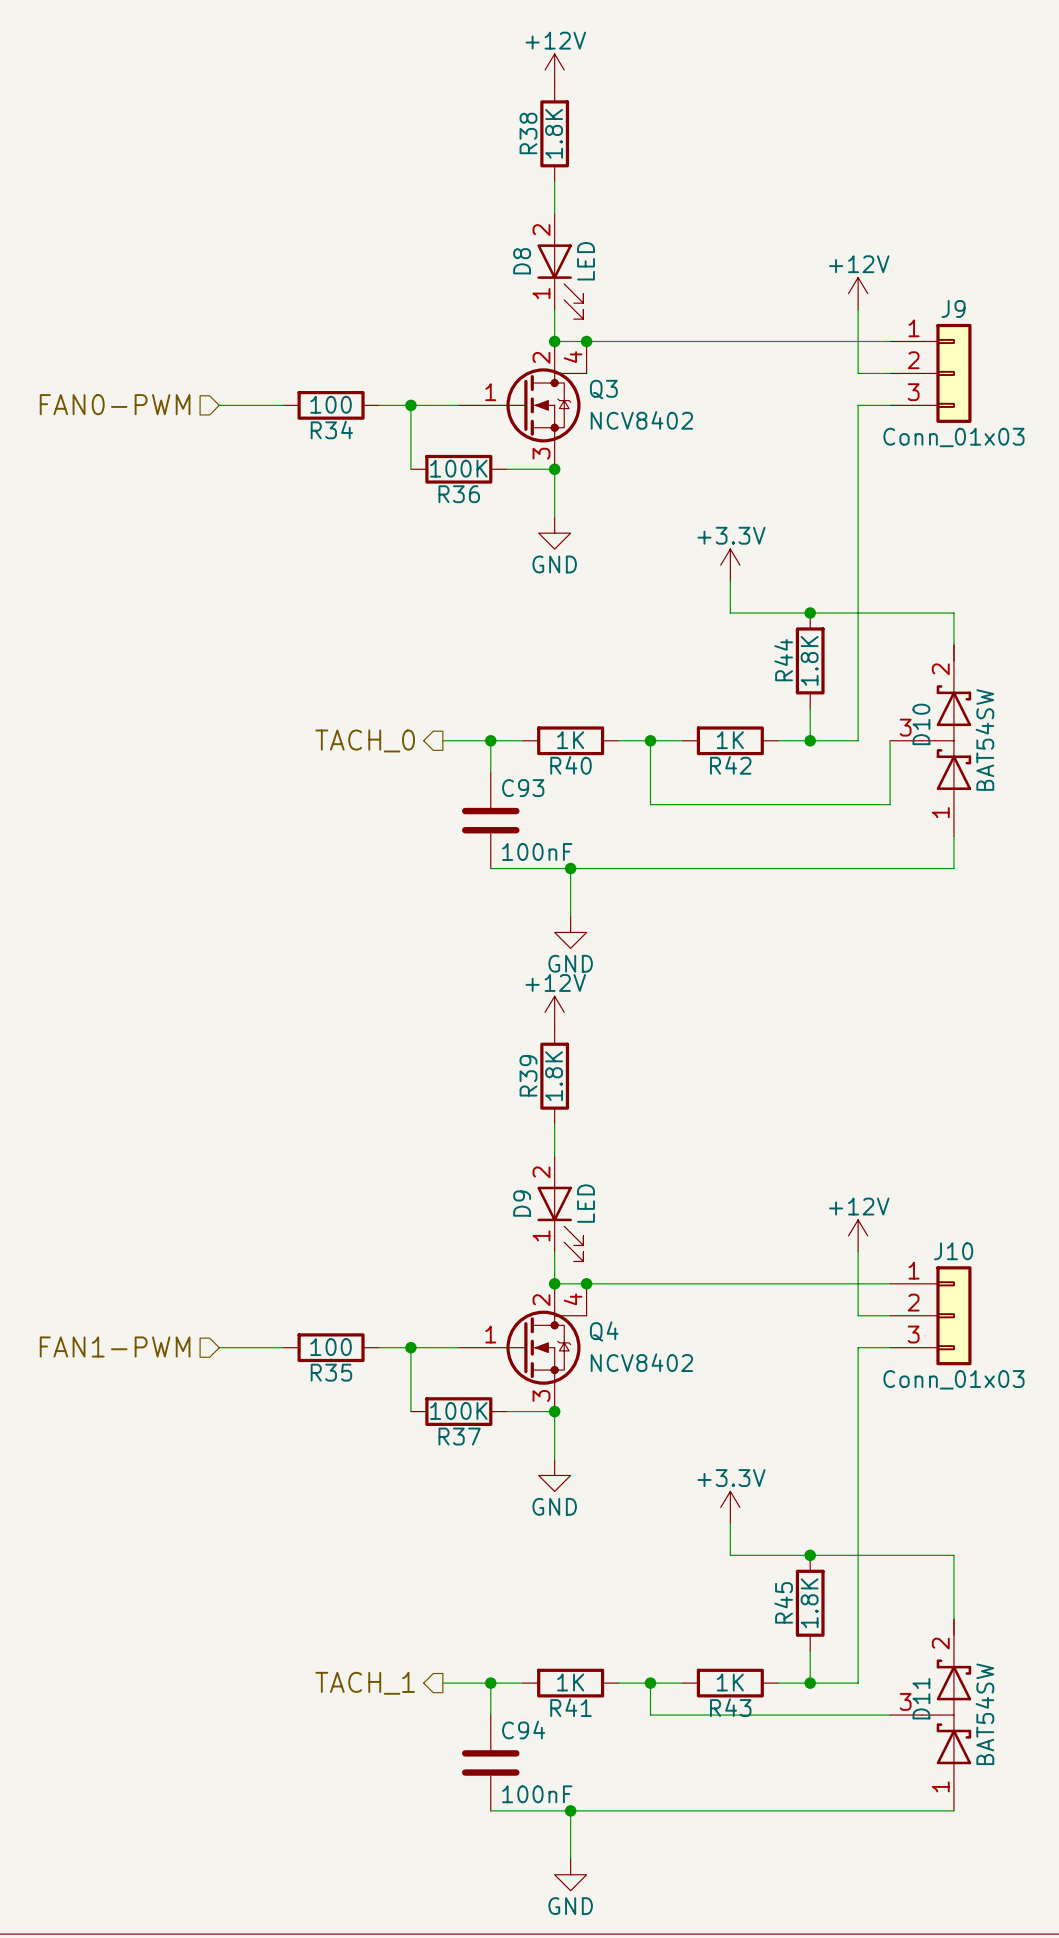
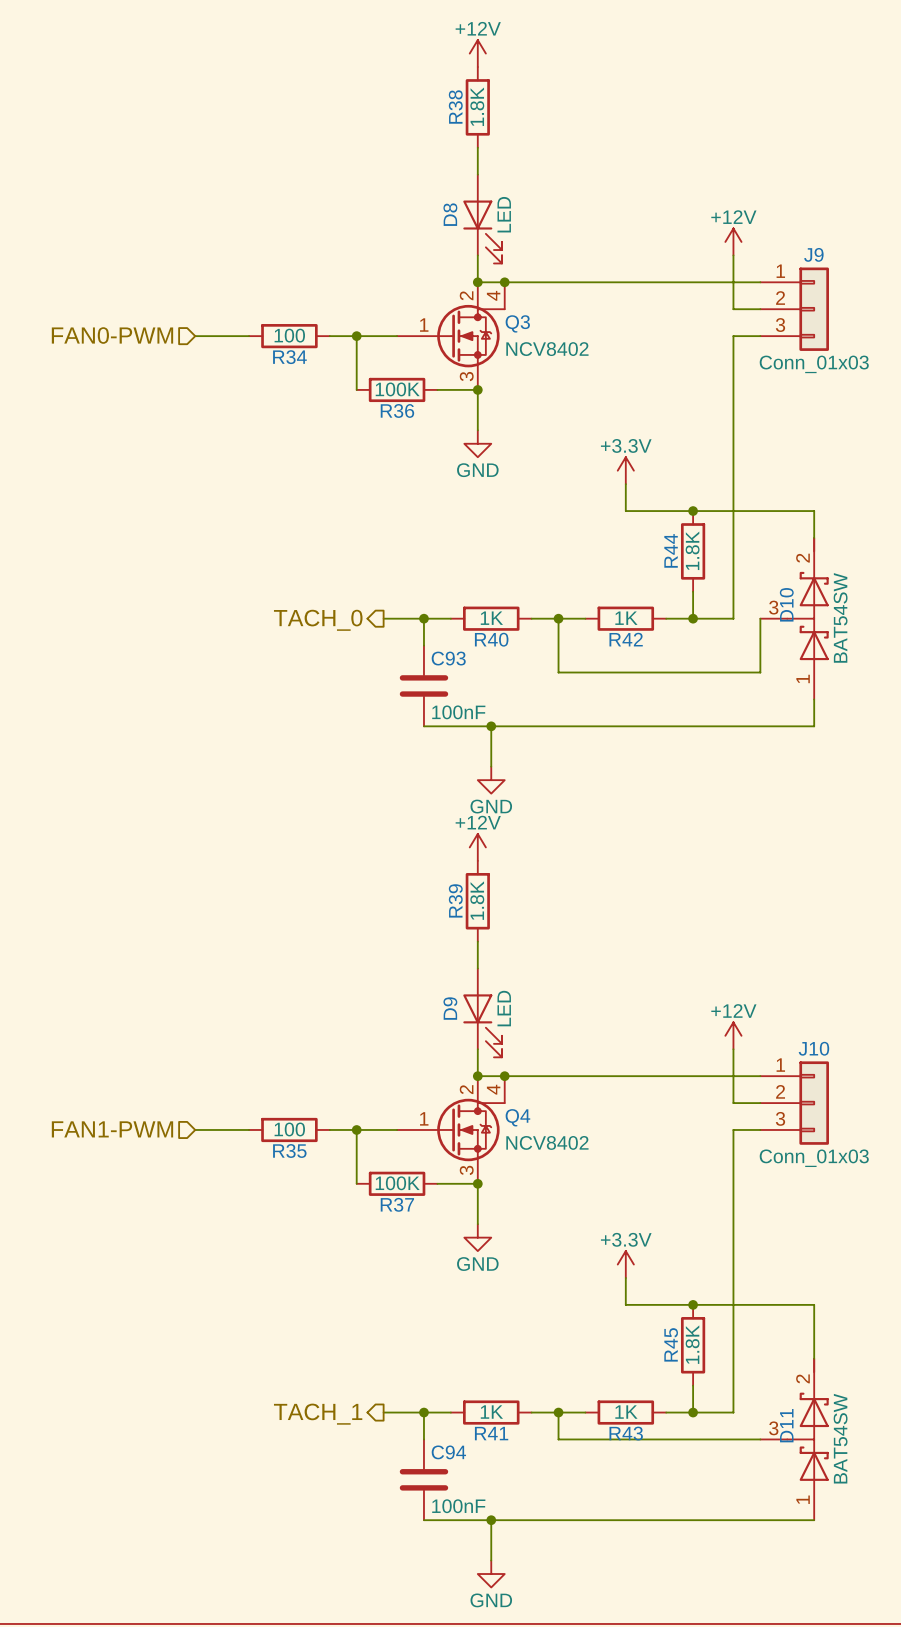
D8 pin number: 2 (541, 230) -> none
D8 pin number: 1 (541, 293) -> none
D9 pin number: 2 (541, 1172) -> none
D9 pin number: 1 (541, 1235) -> none

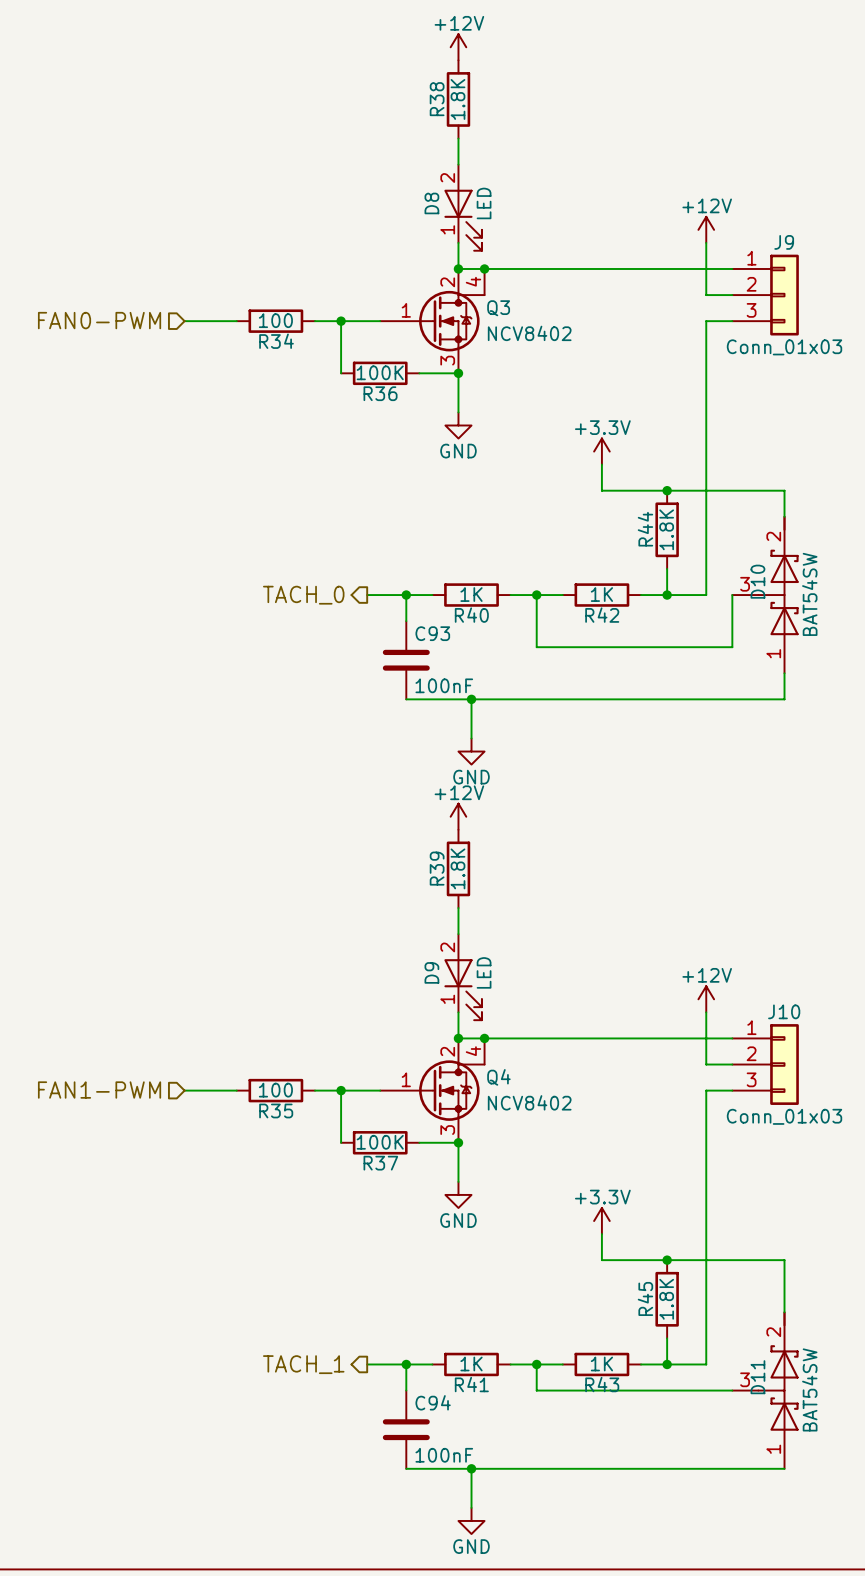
D8 pin number: none -> 2 (447, 178)
D8 pin number: none -> 1 (447, 229)
D9 pin number: none -> 2 (447, 947)
D9 pin number: none -> 1 (447, 999)

